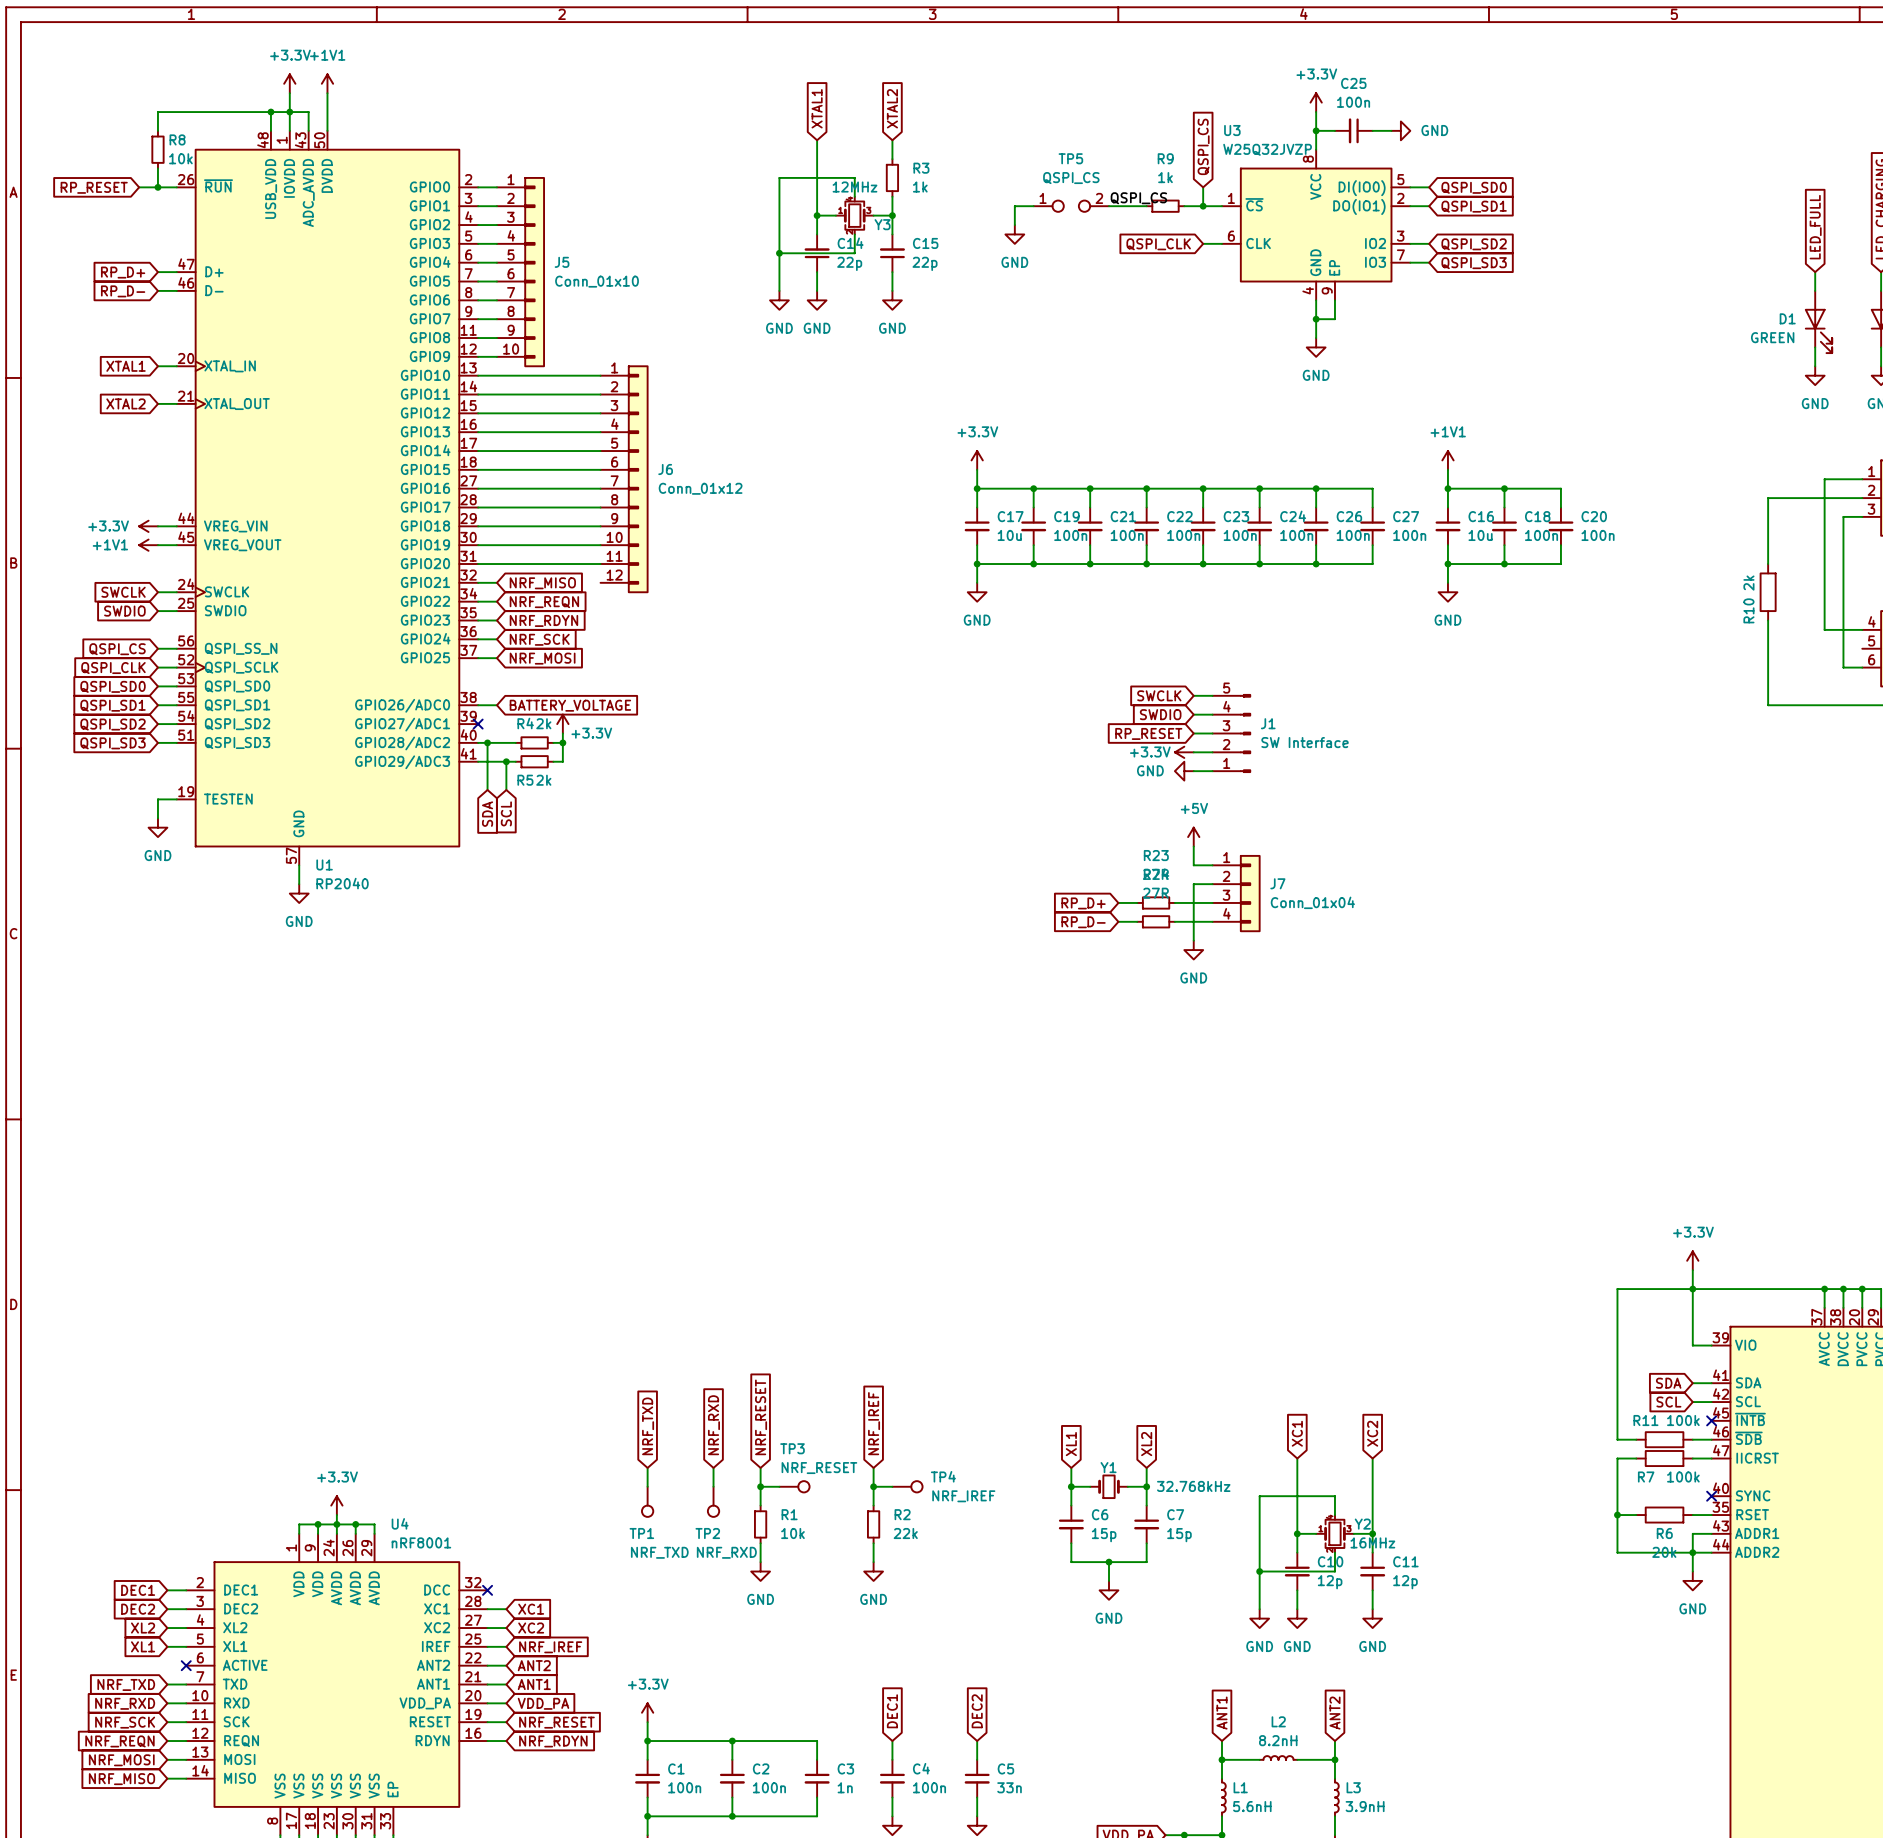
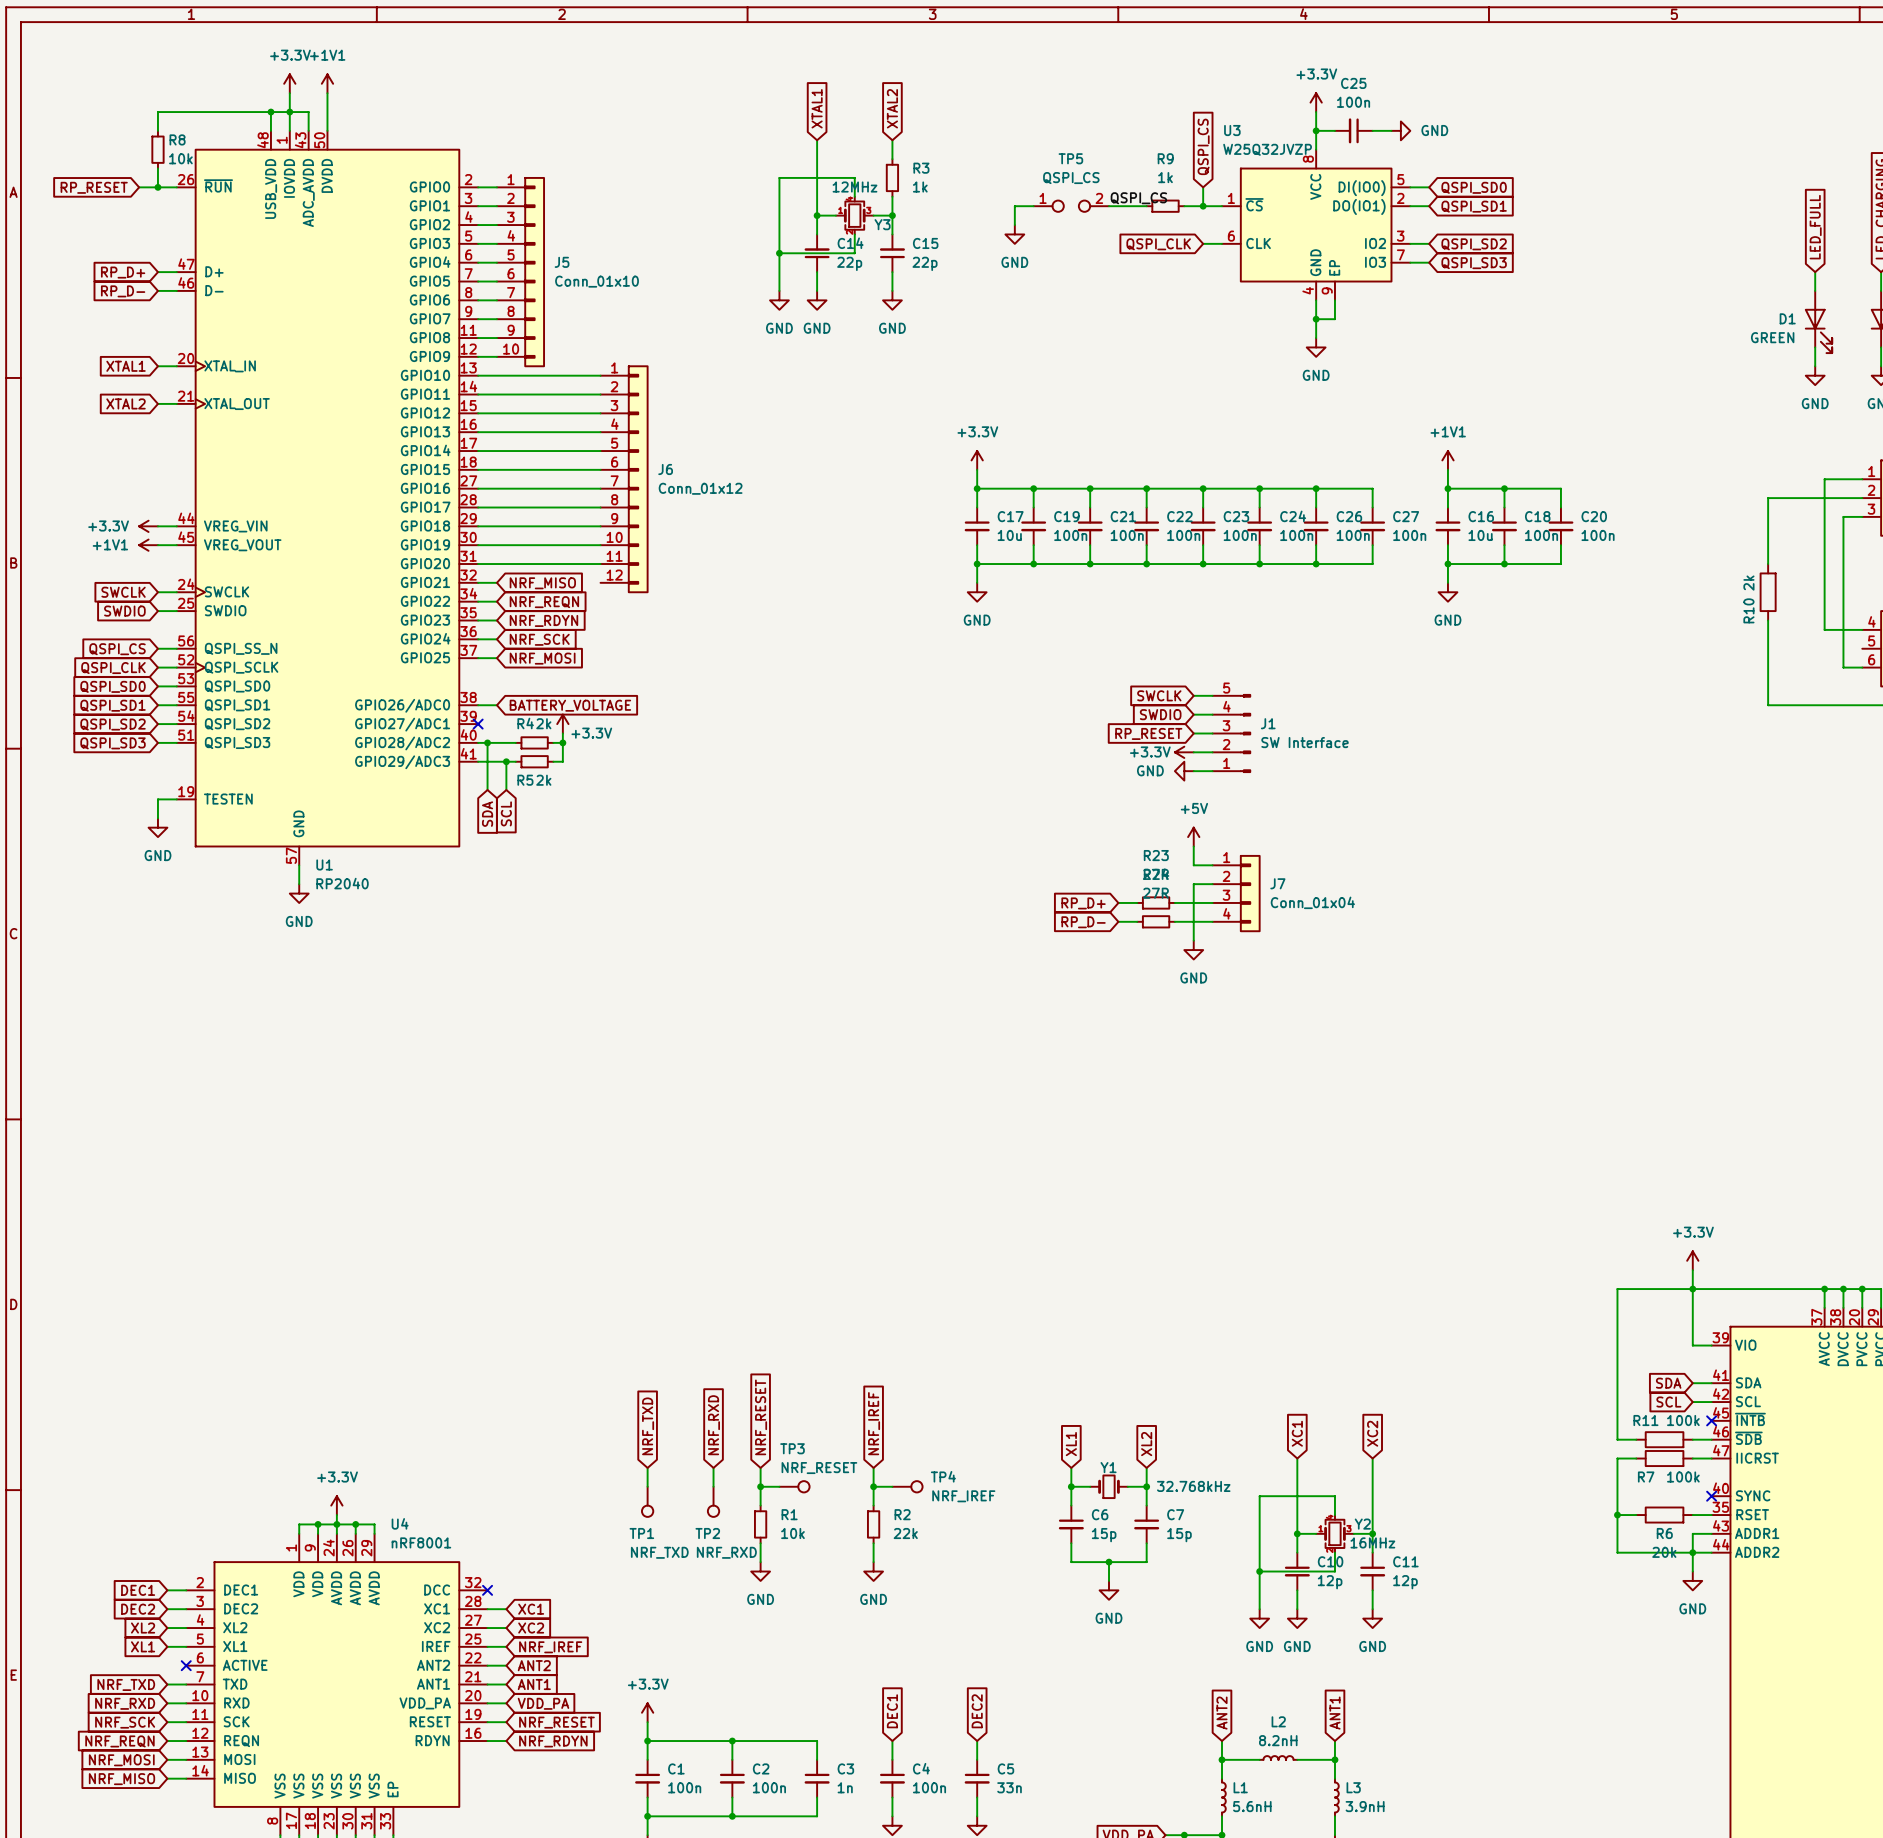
global label: ANT1 (1221, 1713) -> ANT2 (1221, 1713)
global label: ANT2 (1334, 1713) -> ANT1 (1334, 1713)

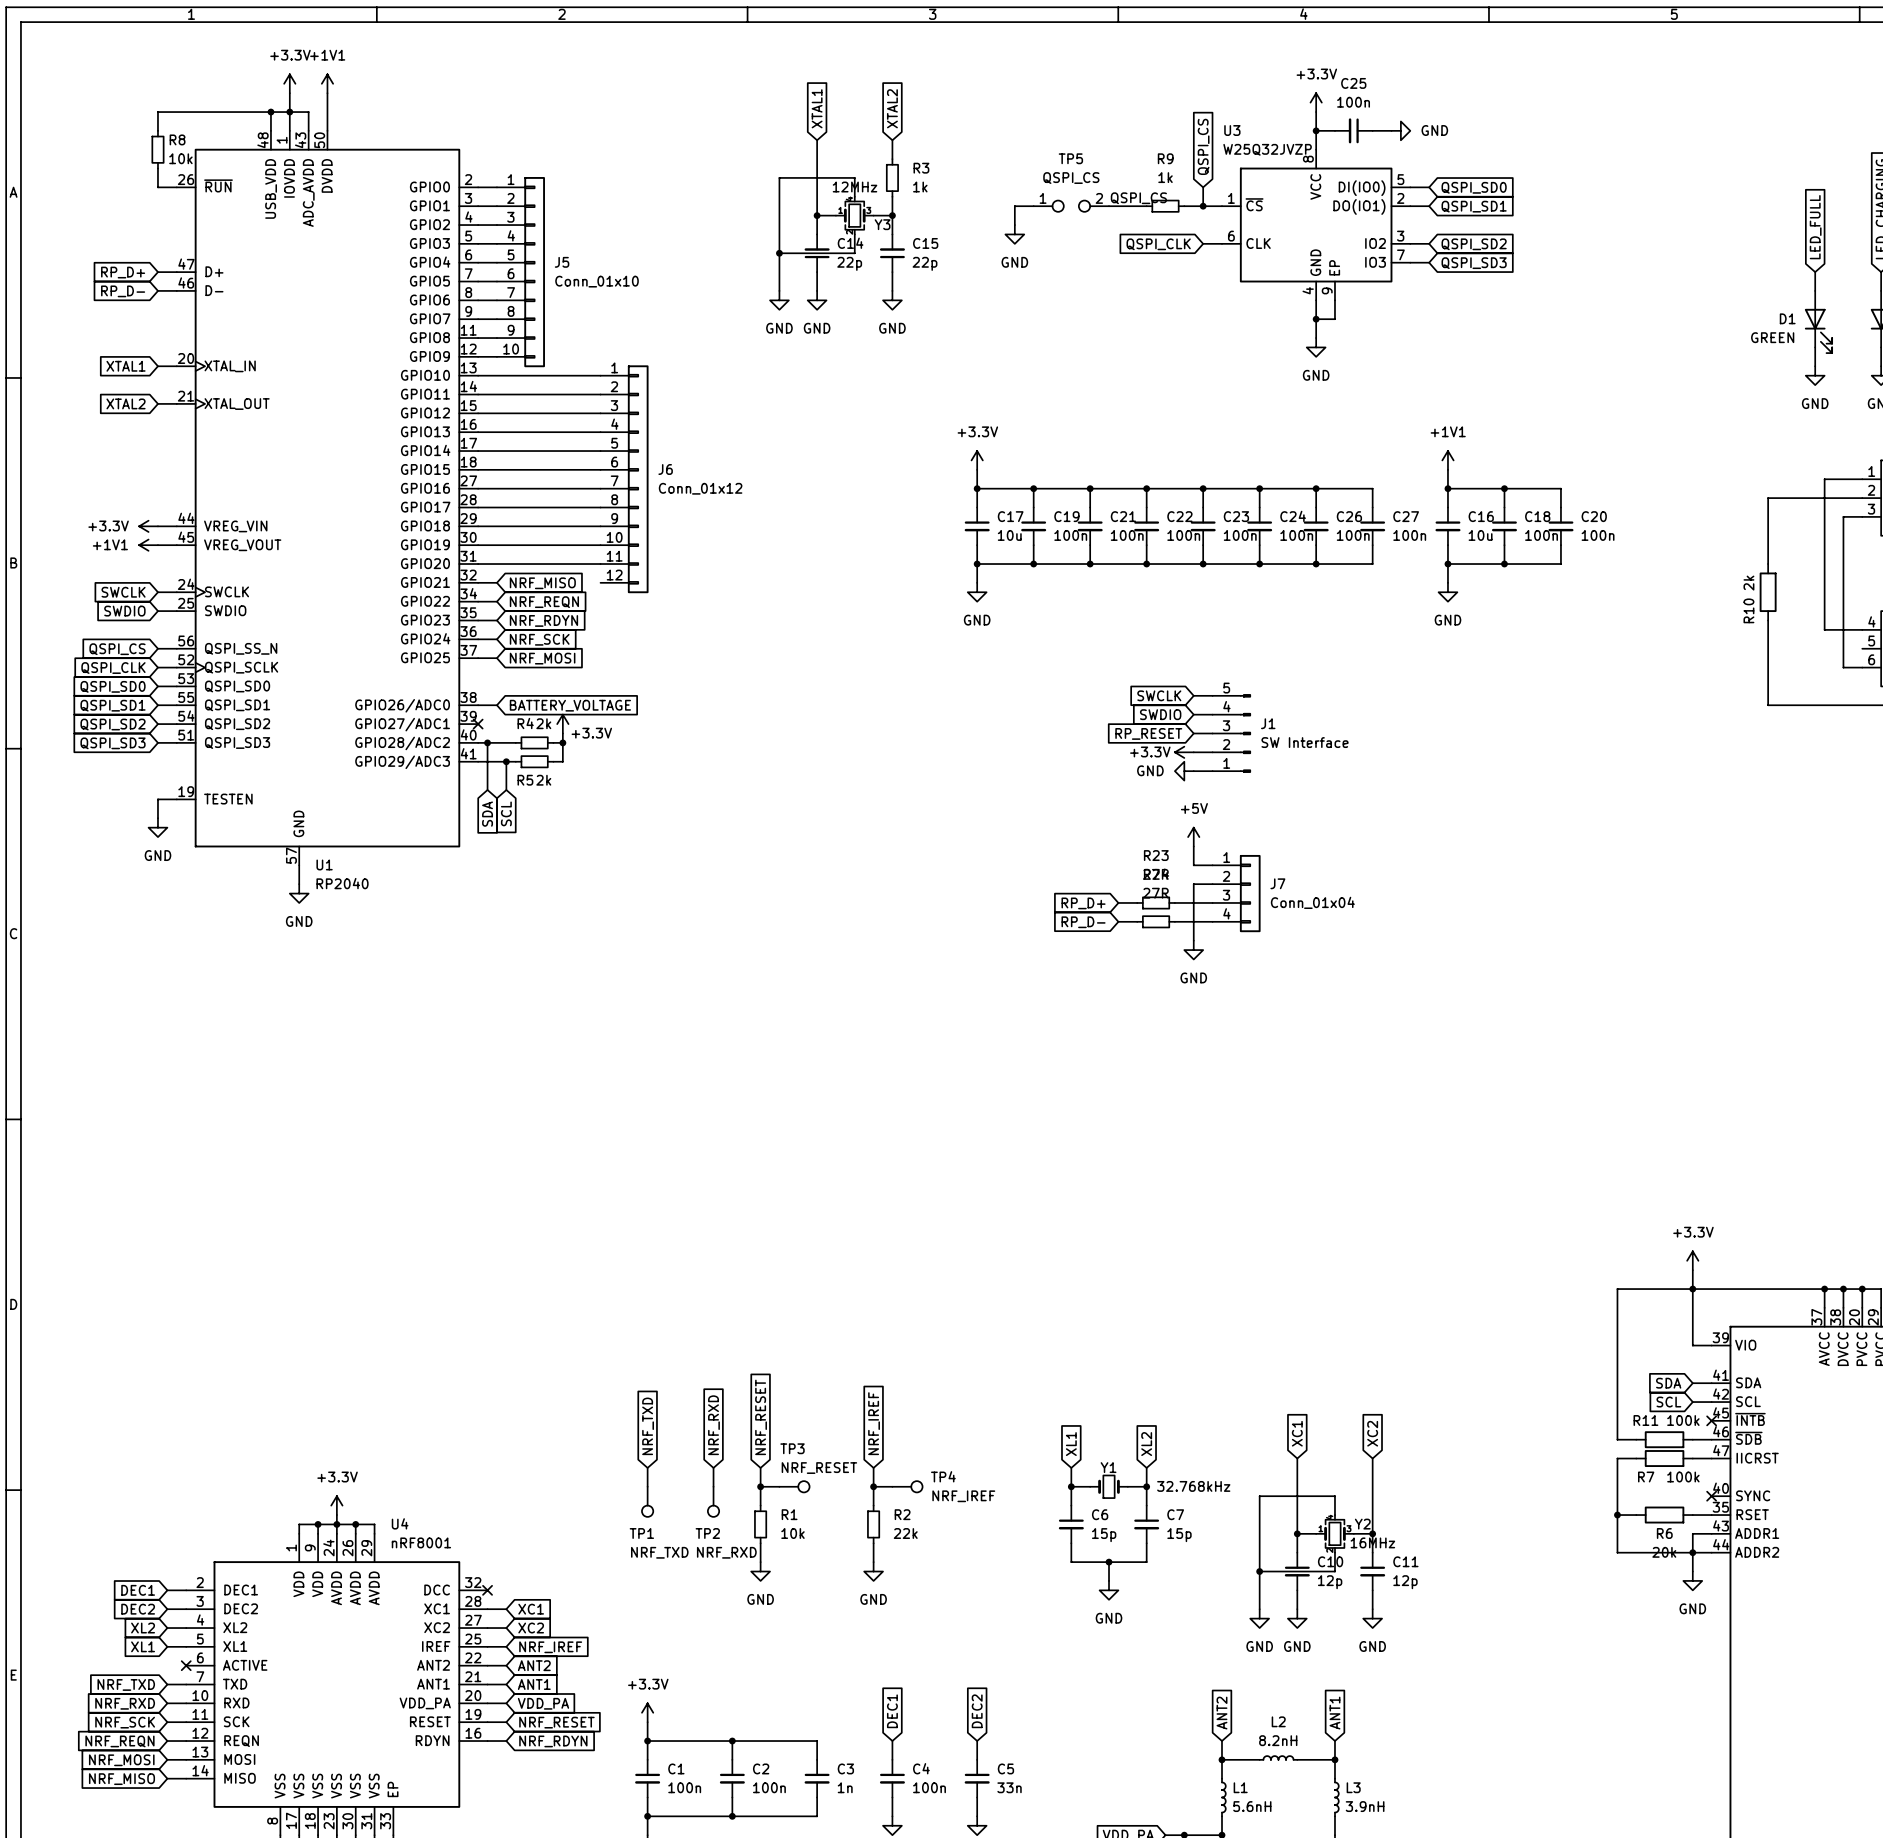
global label: RP_RESET (94, 187) -> none
wire: (139, 187) (157, 187) -> none
junction: (157, 187) -> none

